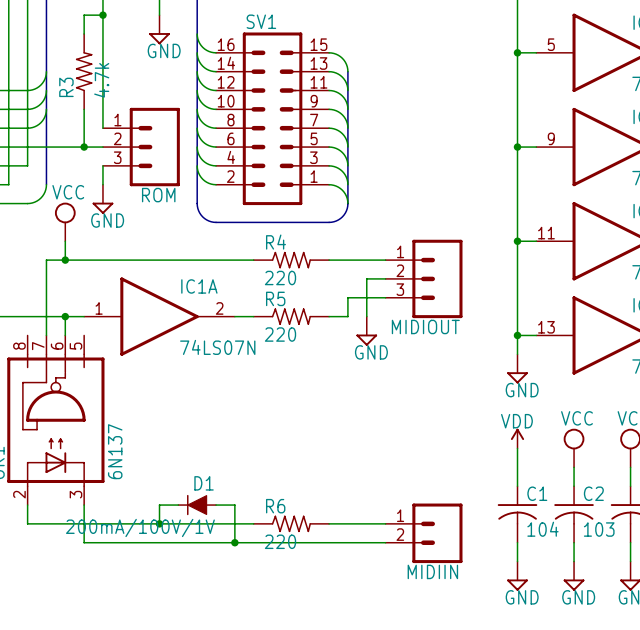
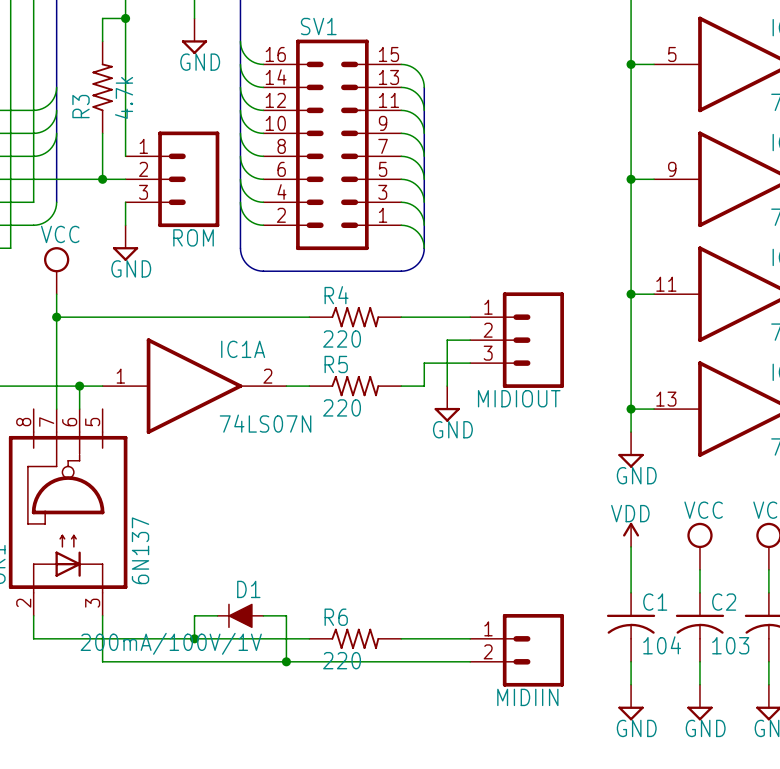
bus: (46, 165) (46, 184) -> none
wire: (46, 184) (43, 194) (37, 201) (30, 203) (8, 203) -> (56, 202) (53, 213) (45, 222) (36, 225) (10, 225) (10, 248)
power symbol position: VCC (65, 221) -> VCC (56, 270)
wire: (65, 241) (65, 260) -> (56, 294) (56, 317)
junction position: (65, 260) -> (56, 317)

